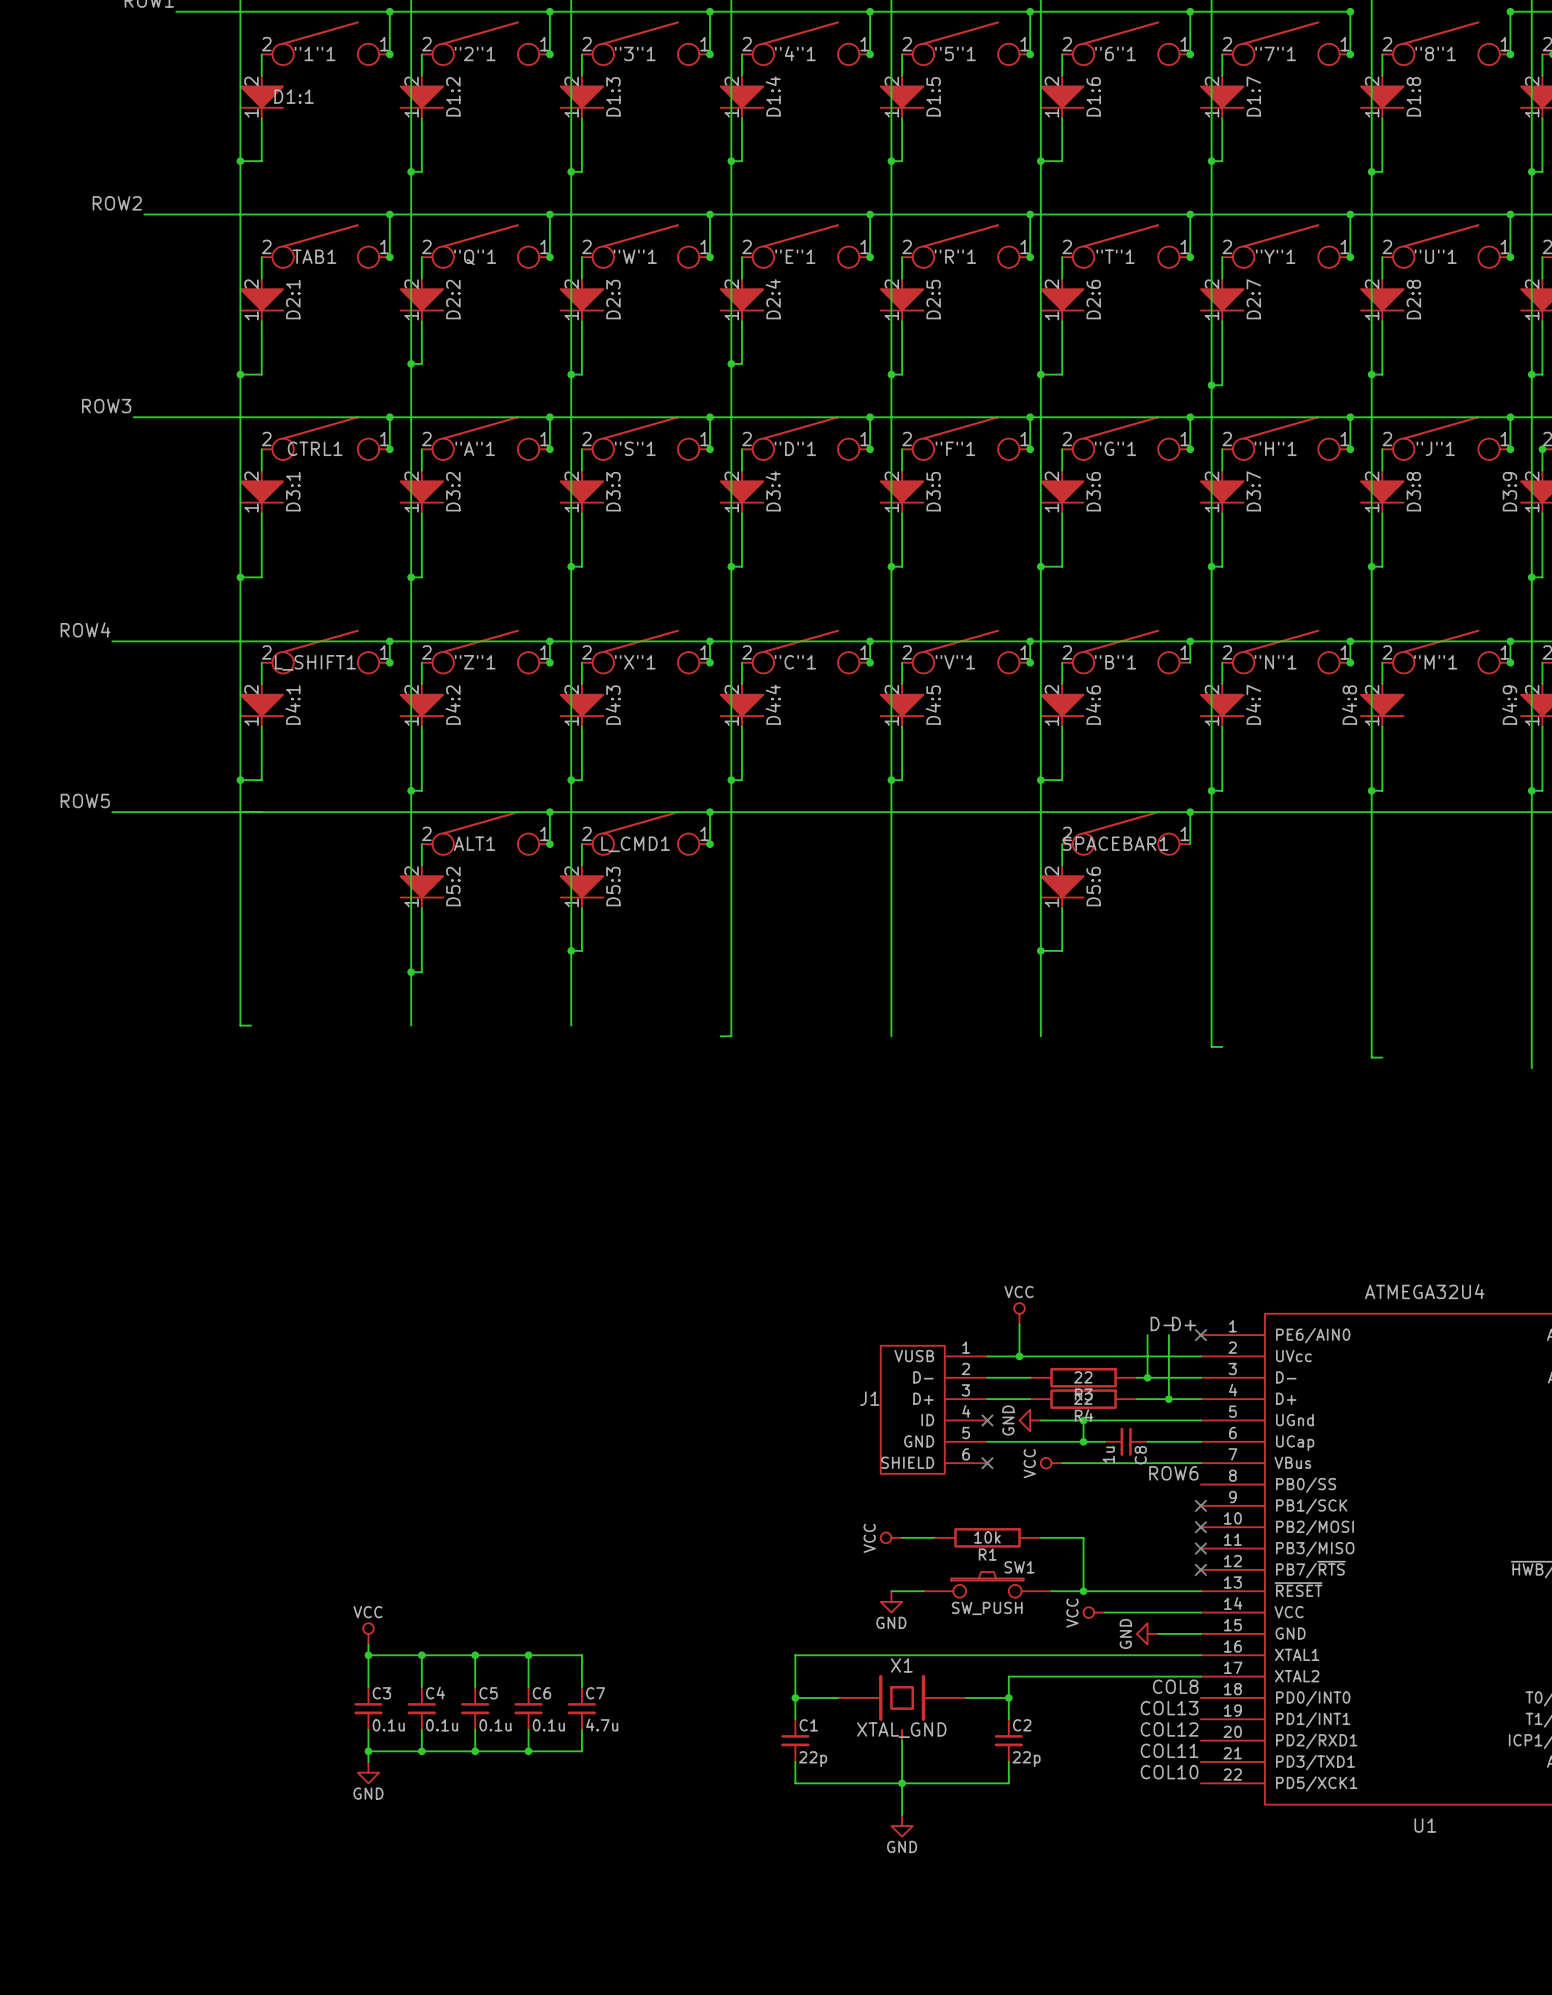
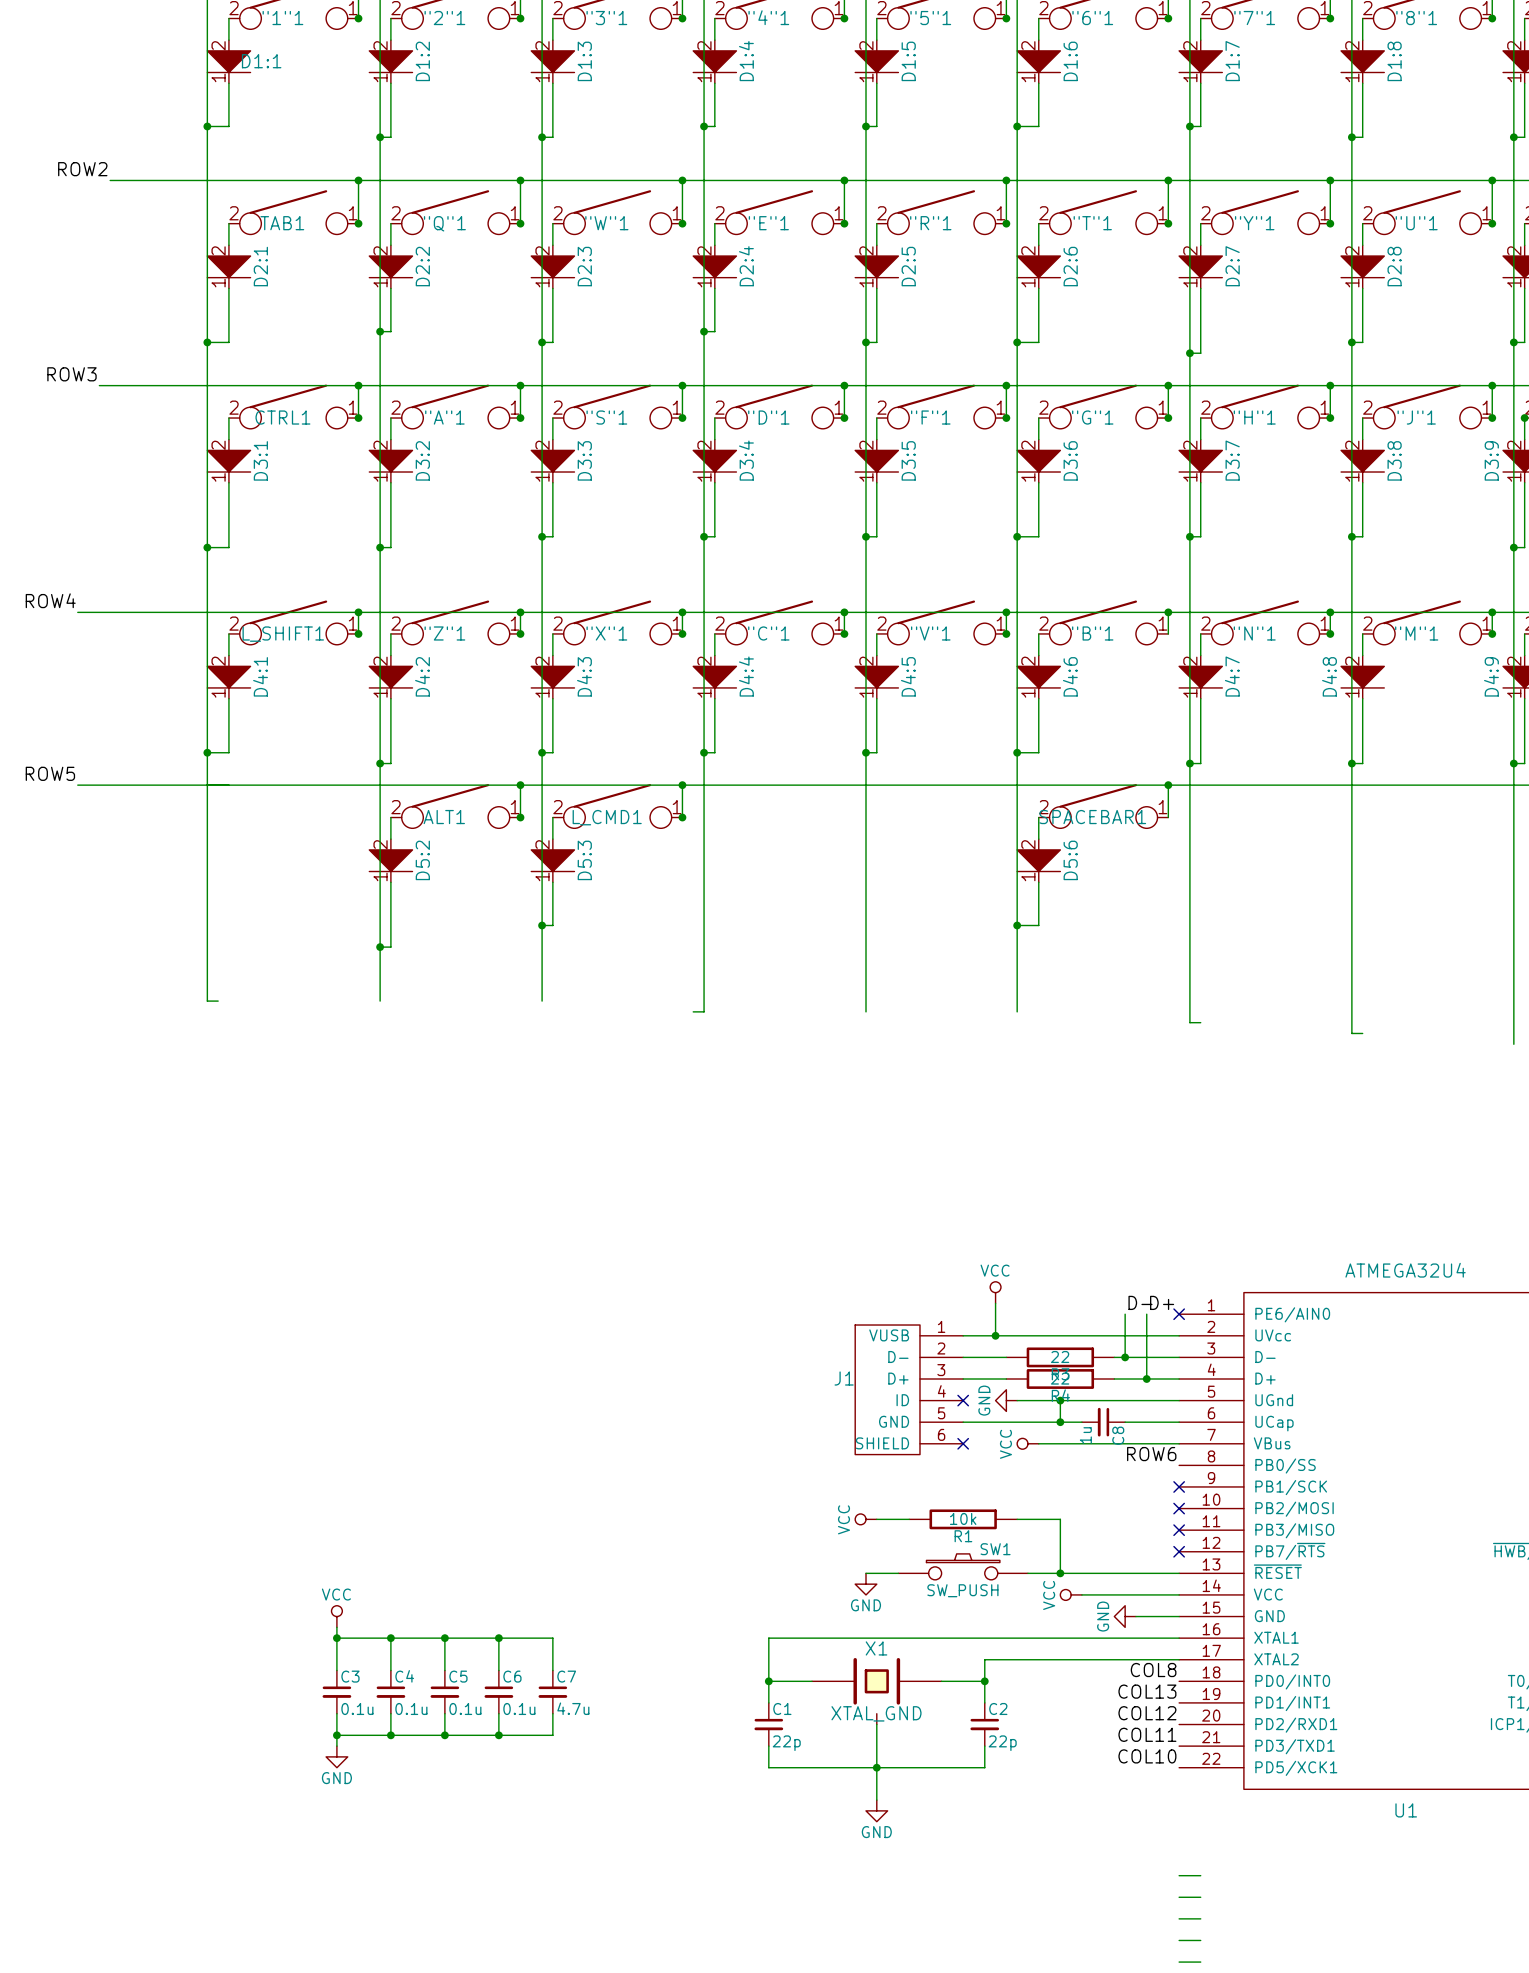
wire: none -> (1179, 1875) (1200, 1875)
wire: none -> (1179, 1897) (1200, 1897)
wire: none -> (1179, 1918) (1200, 1918)
wire: none -> (1179, 1940) (1200, 1940)
wire: none -> (1179, 1962) (1200, 1962)

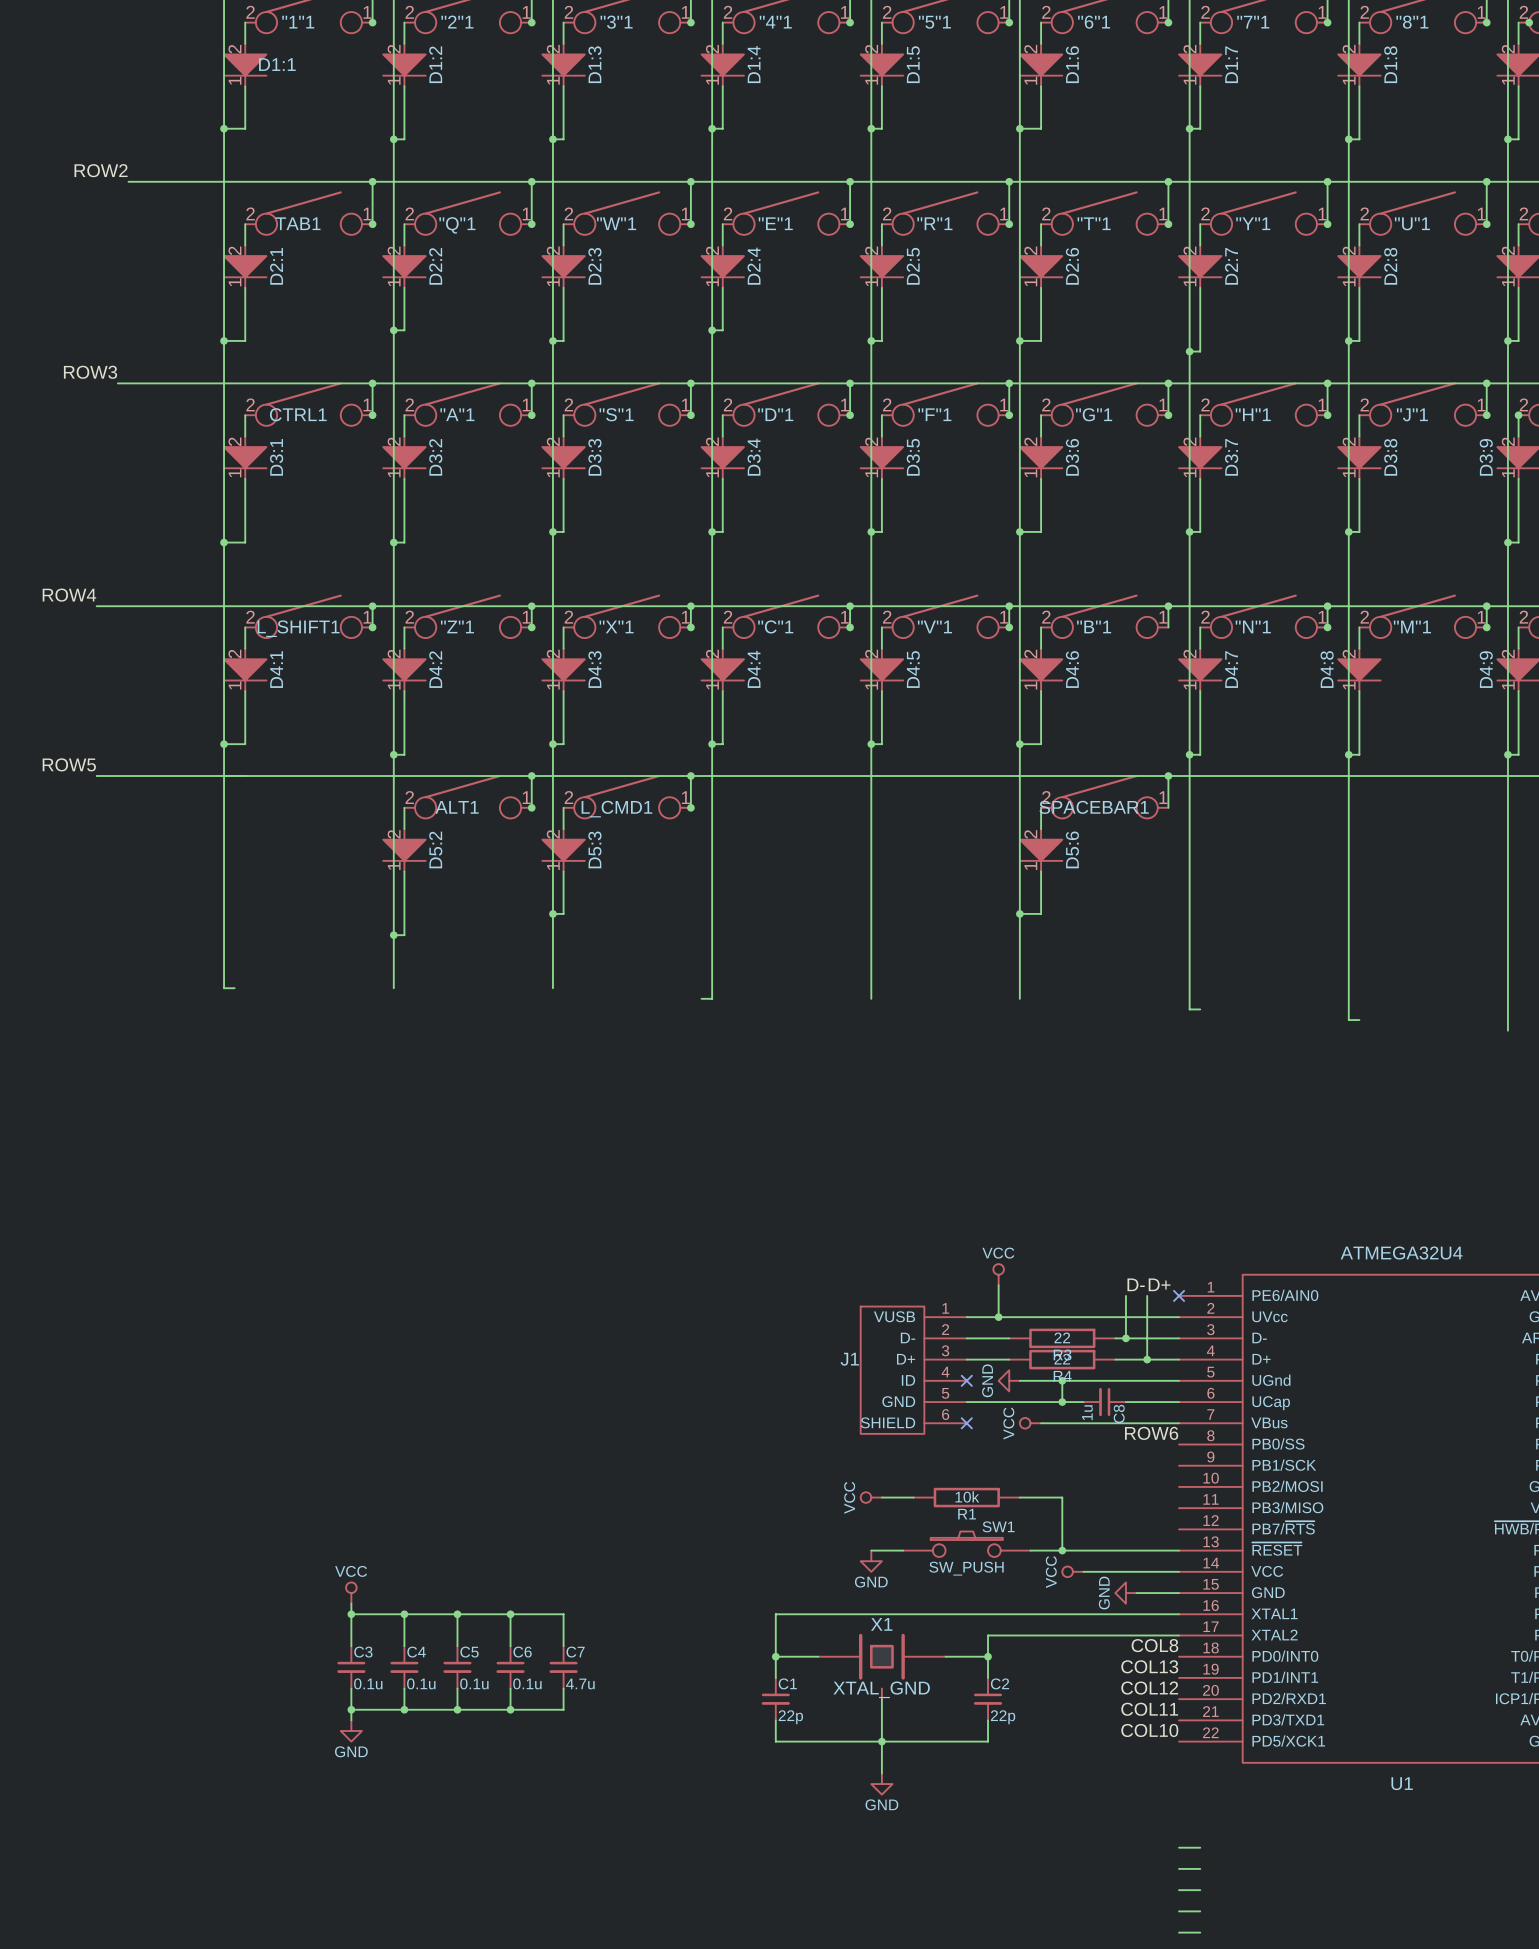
no-connect mark: (1179, 1486) -> none
no-connect mark: (1179, 1508) -> none
no-connect mark: (1179, 1530) -> none
no-connect mark: (1179, 1551) -> none

